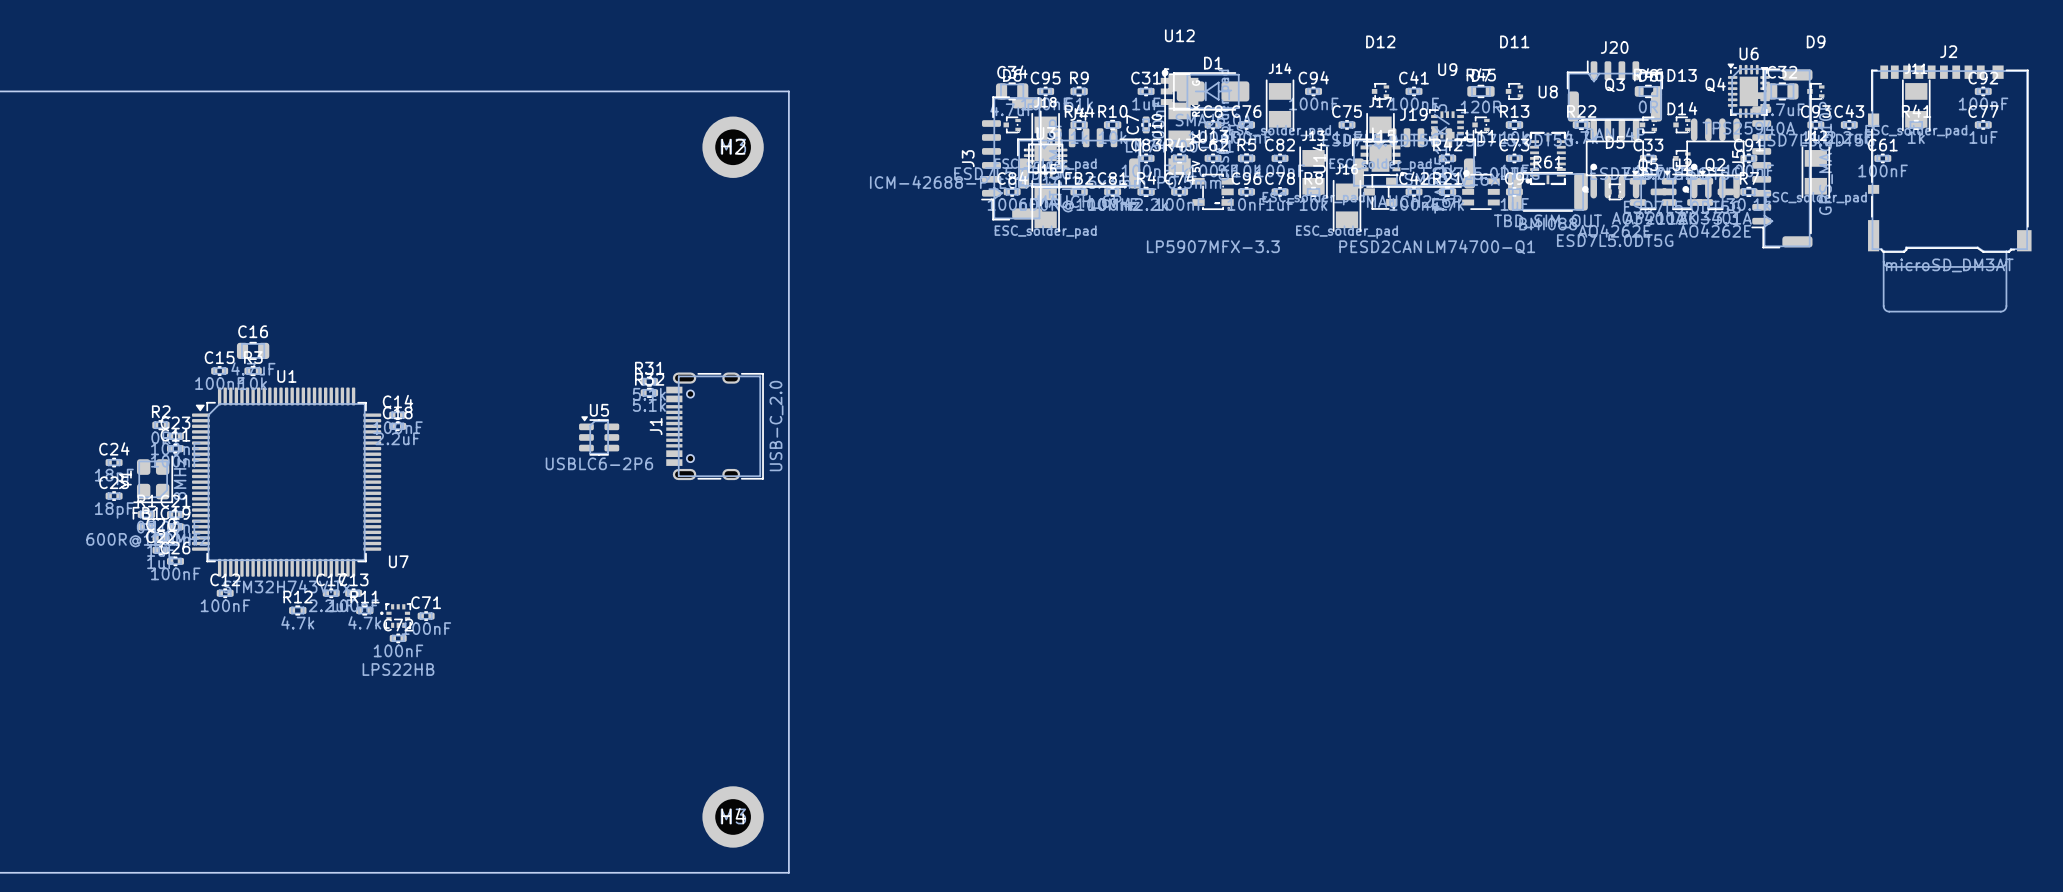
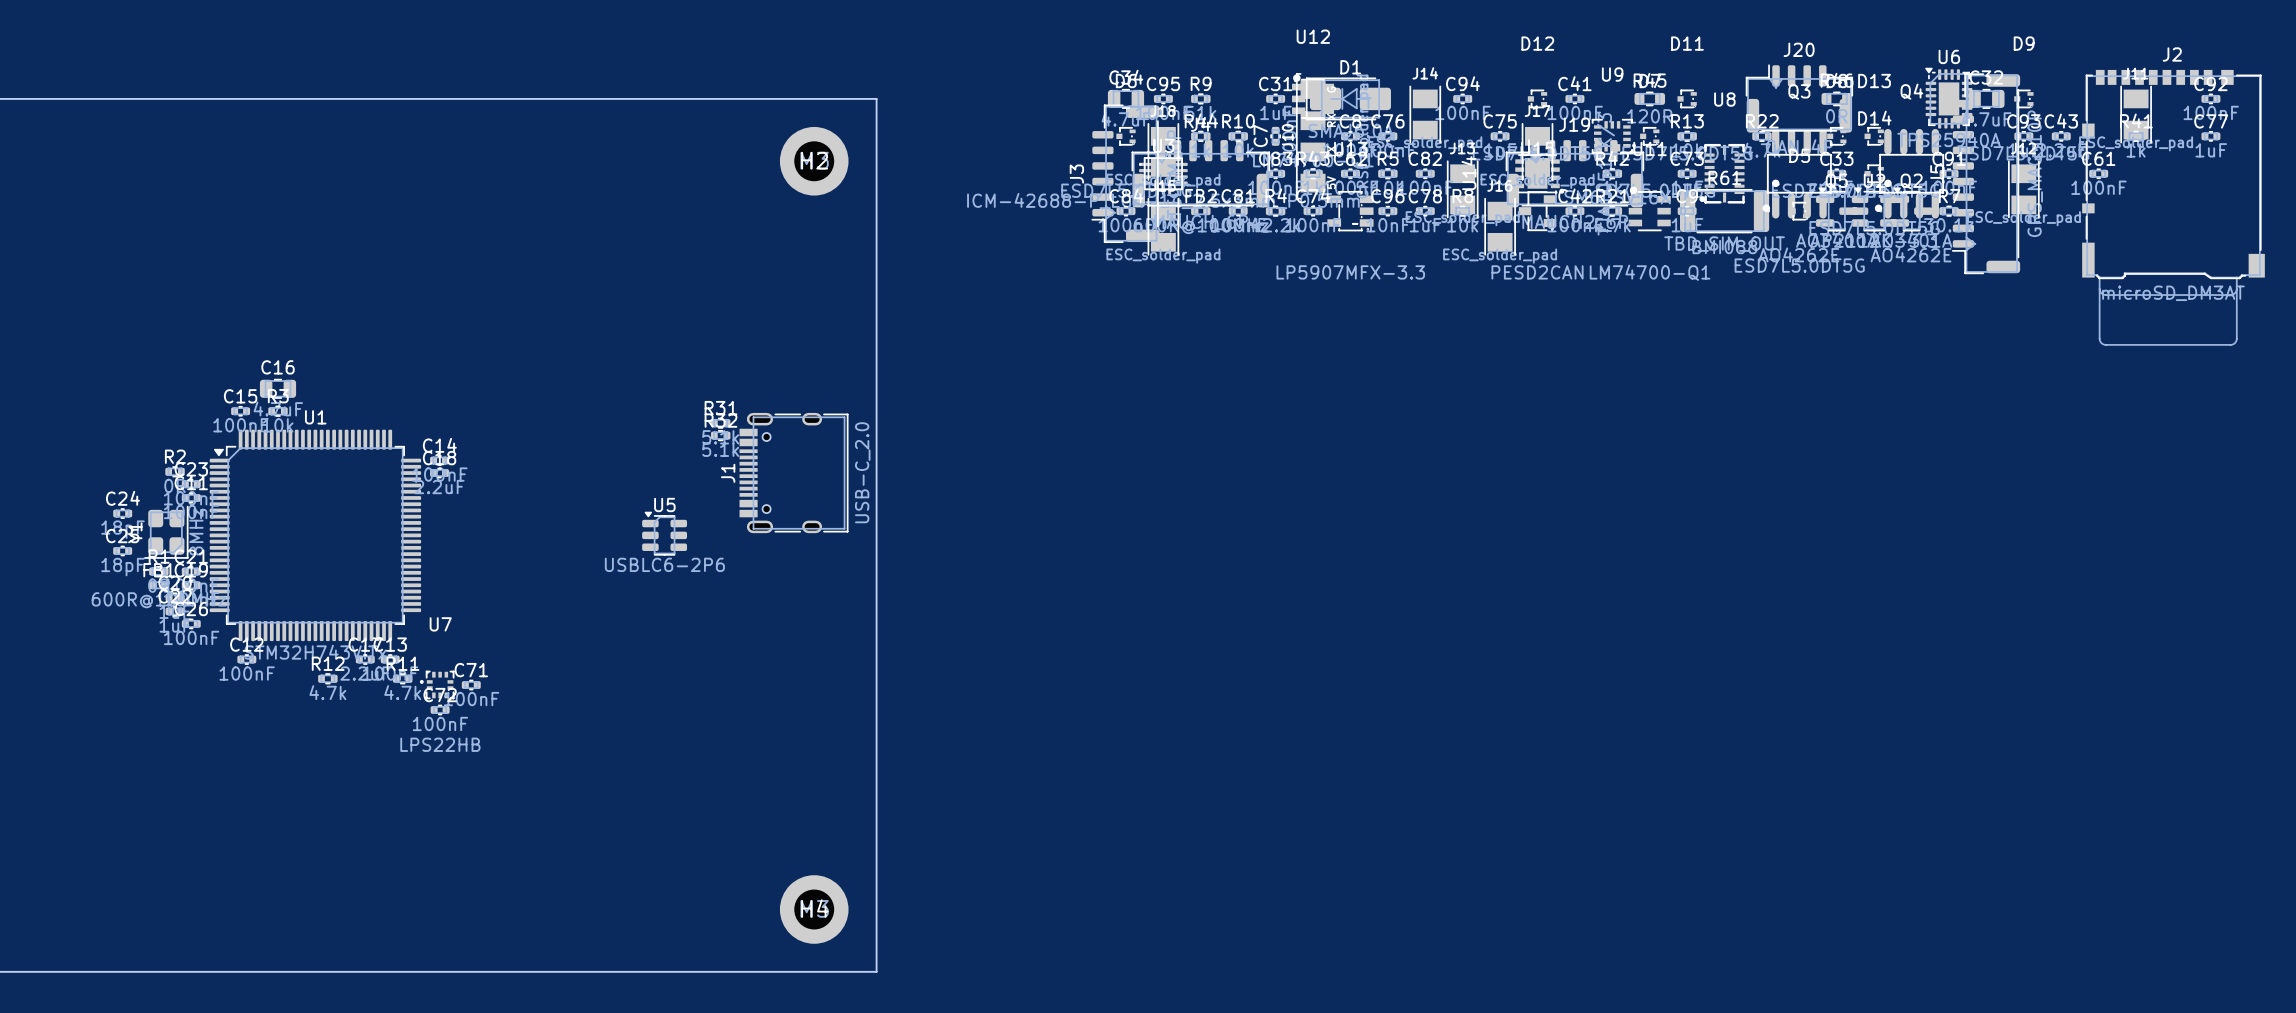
U5 position: (599, 435) -> (664, 533)

